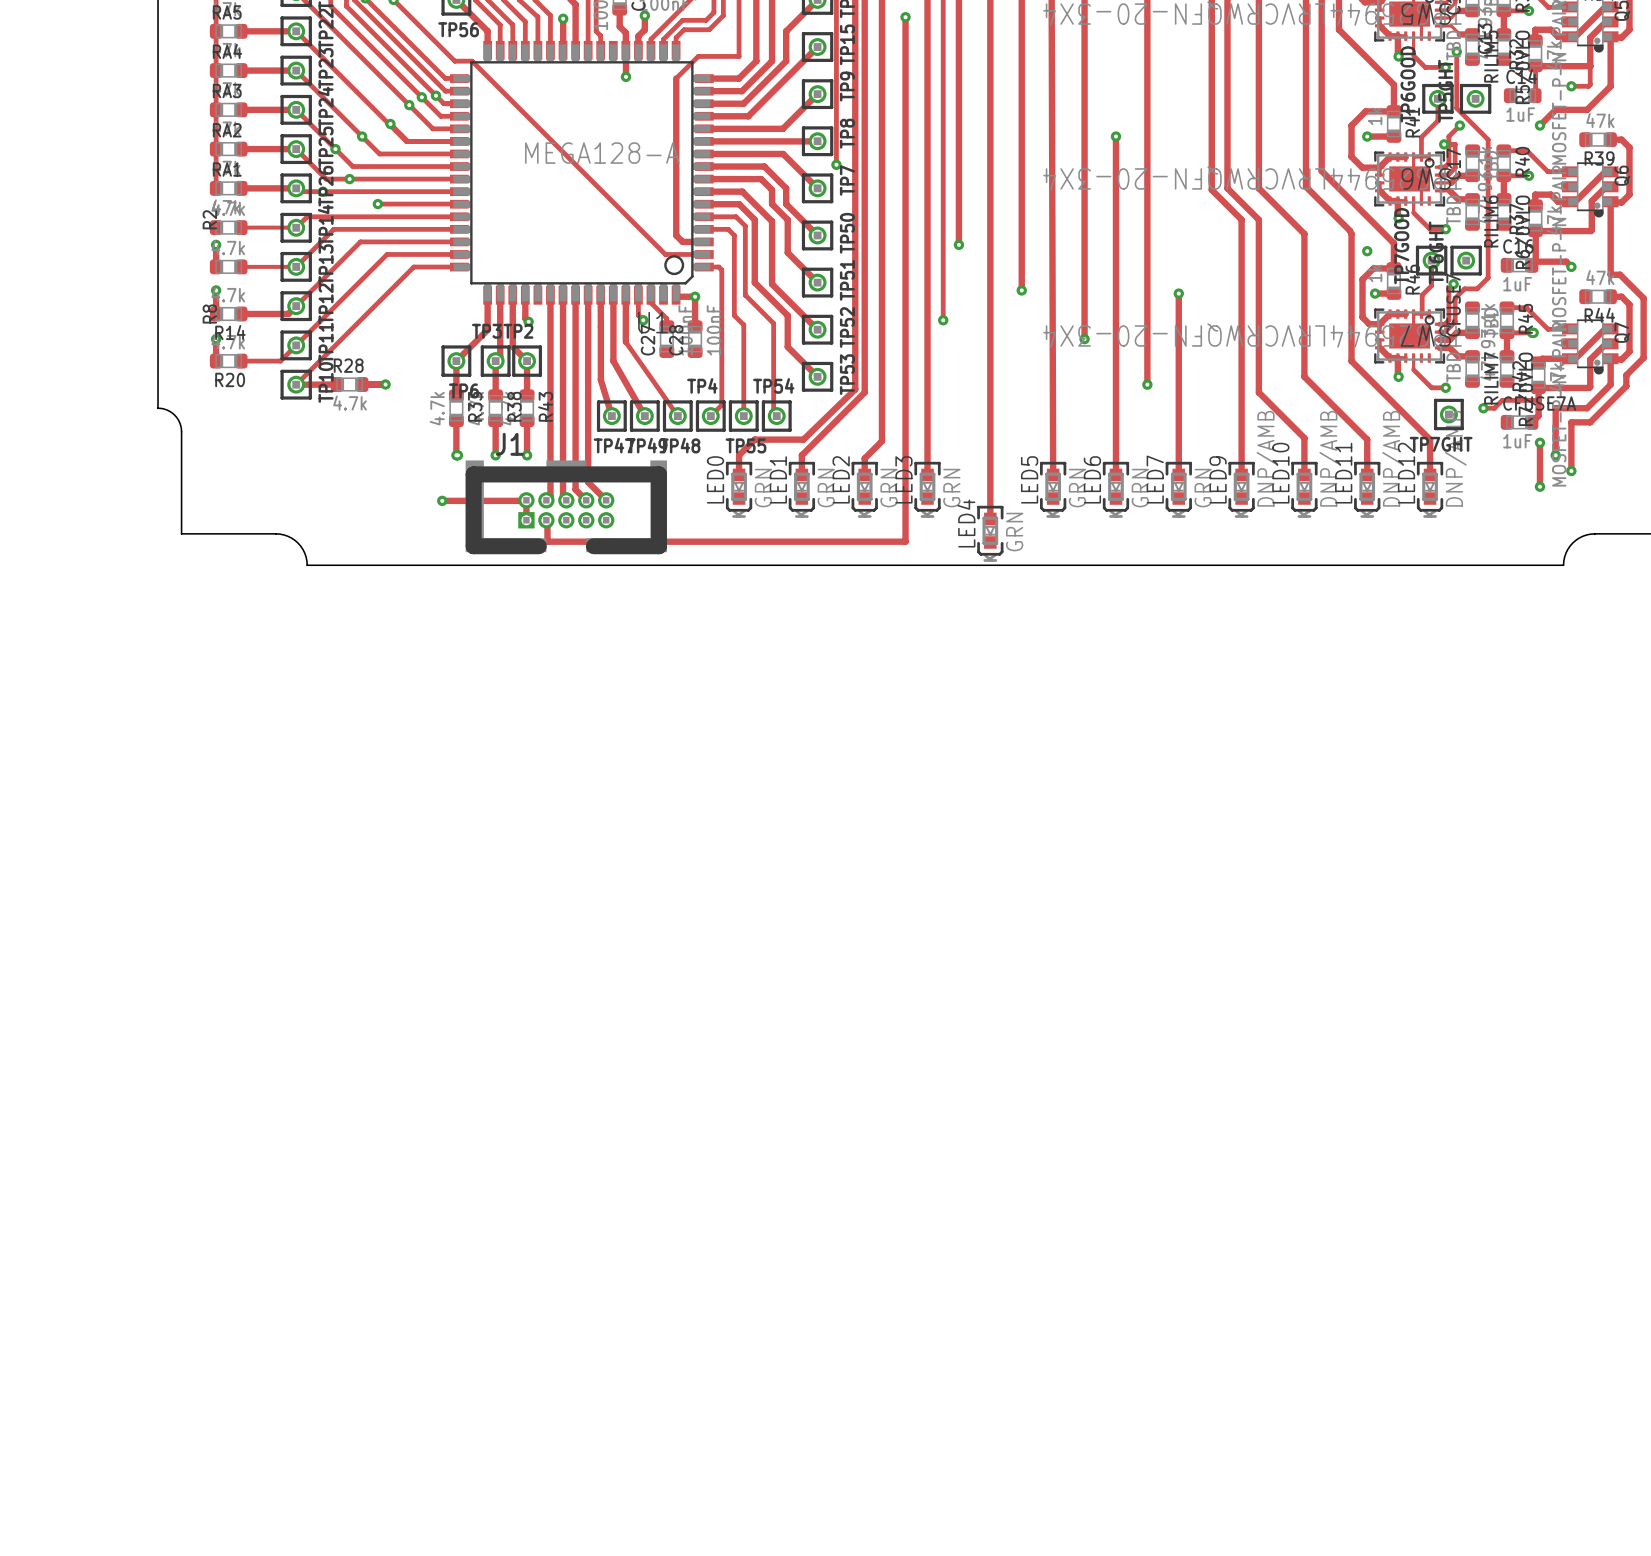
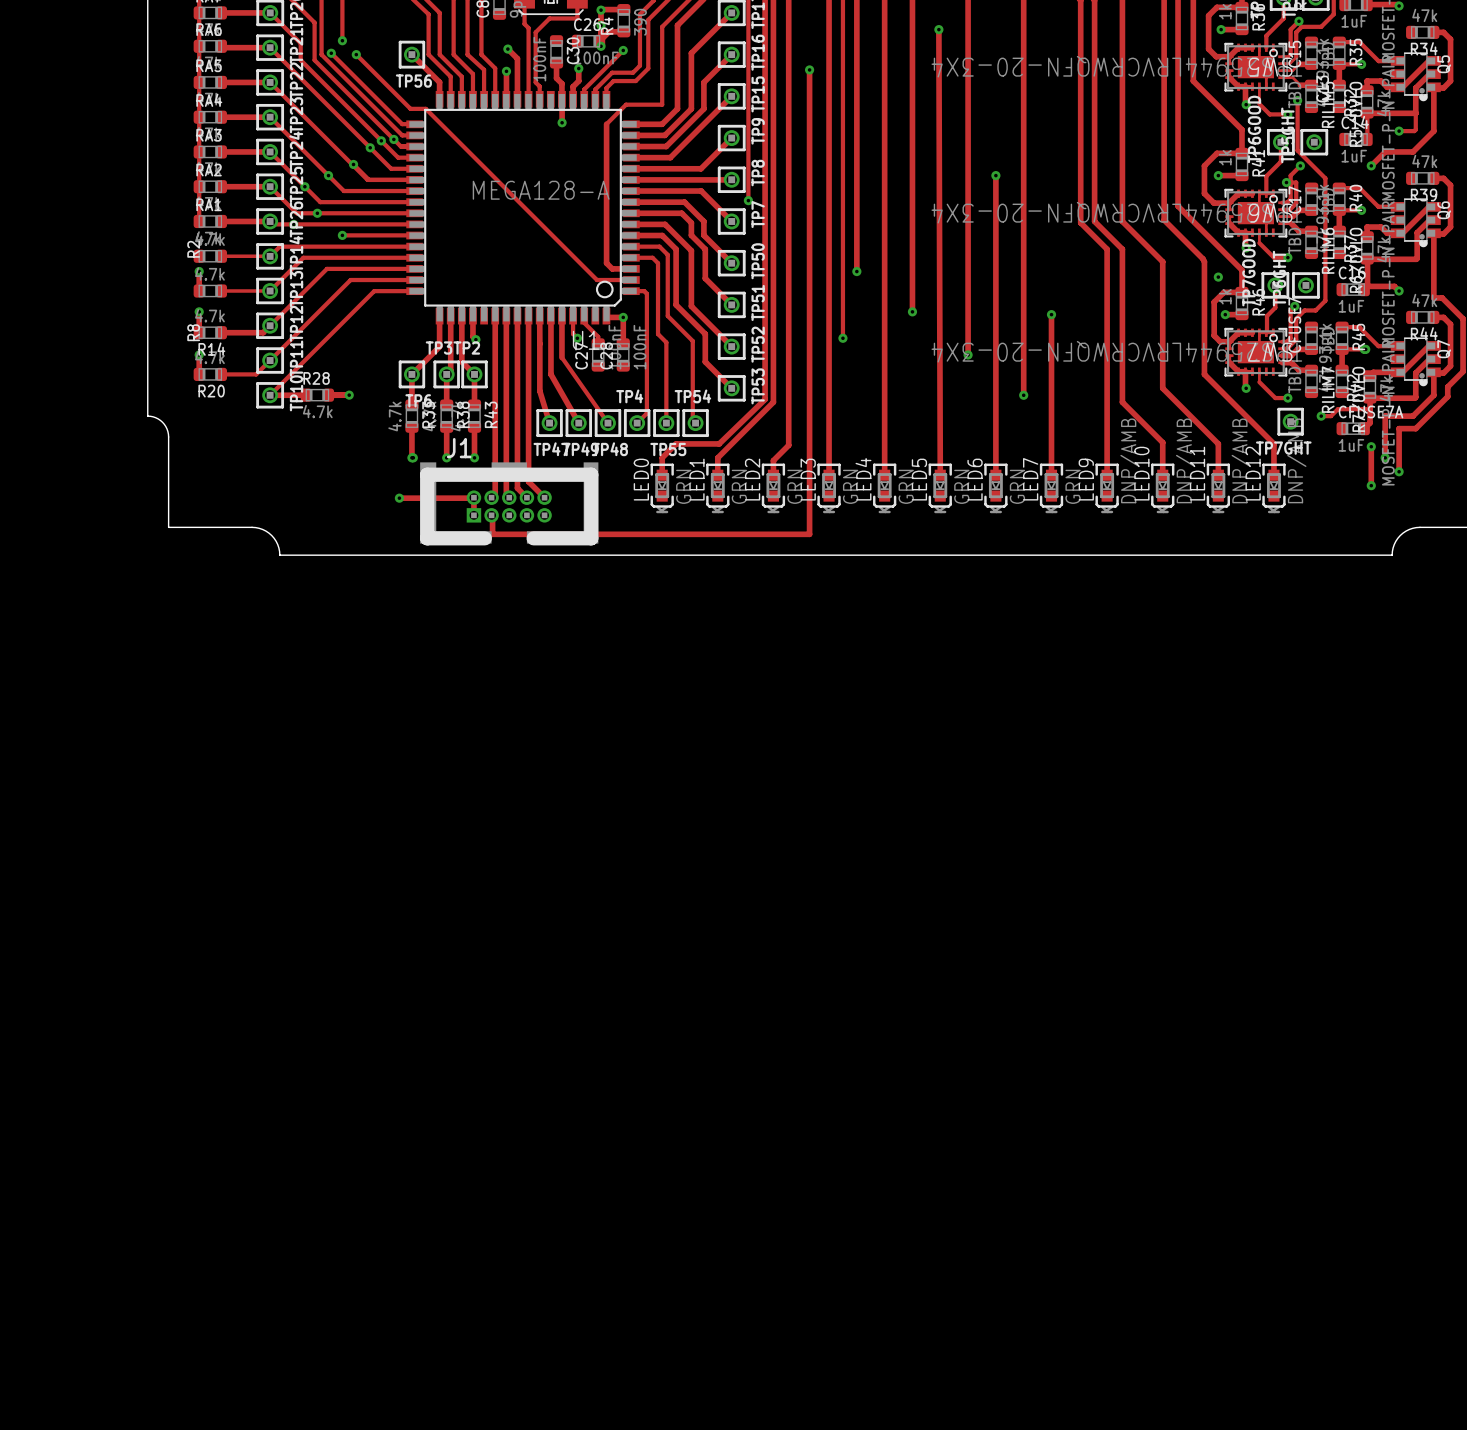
track: (990, 474) (990, 518) -> none
LED4 position: (990, 530) -> (884, 485)

